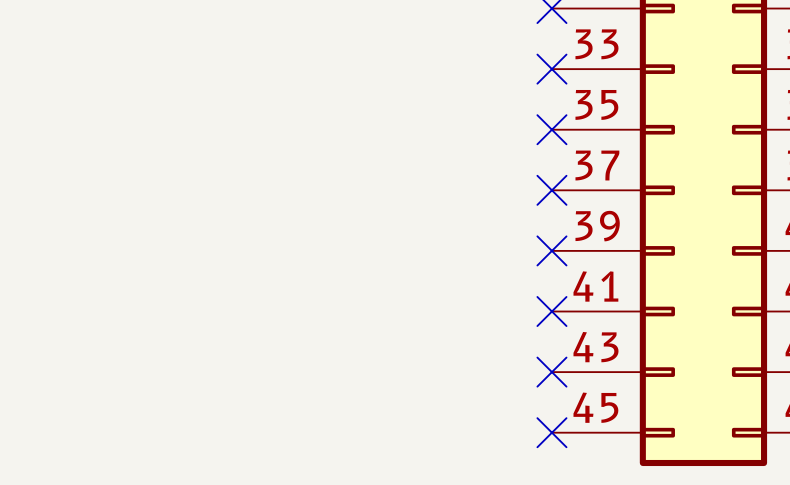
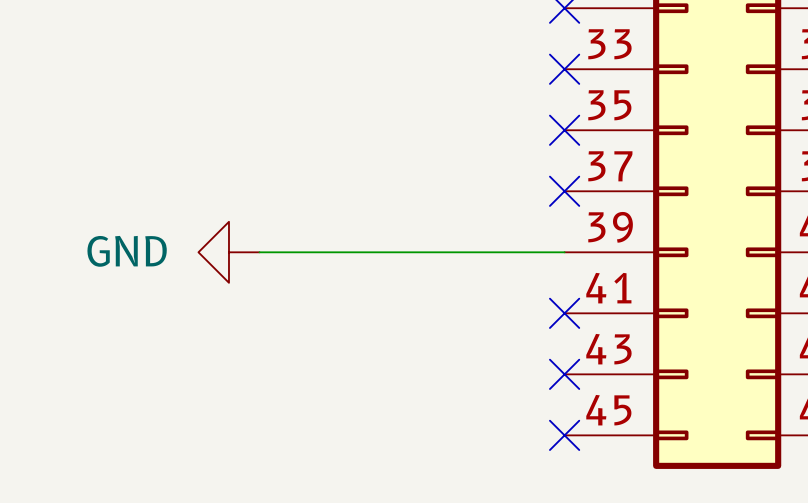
power symbol: none -> GND (228, 252)
wire: none -> (259, 252) (564, 252)
no-connect mark: (551, 250) -> none

